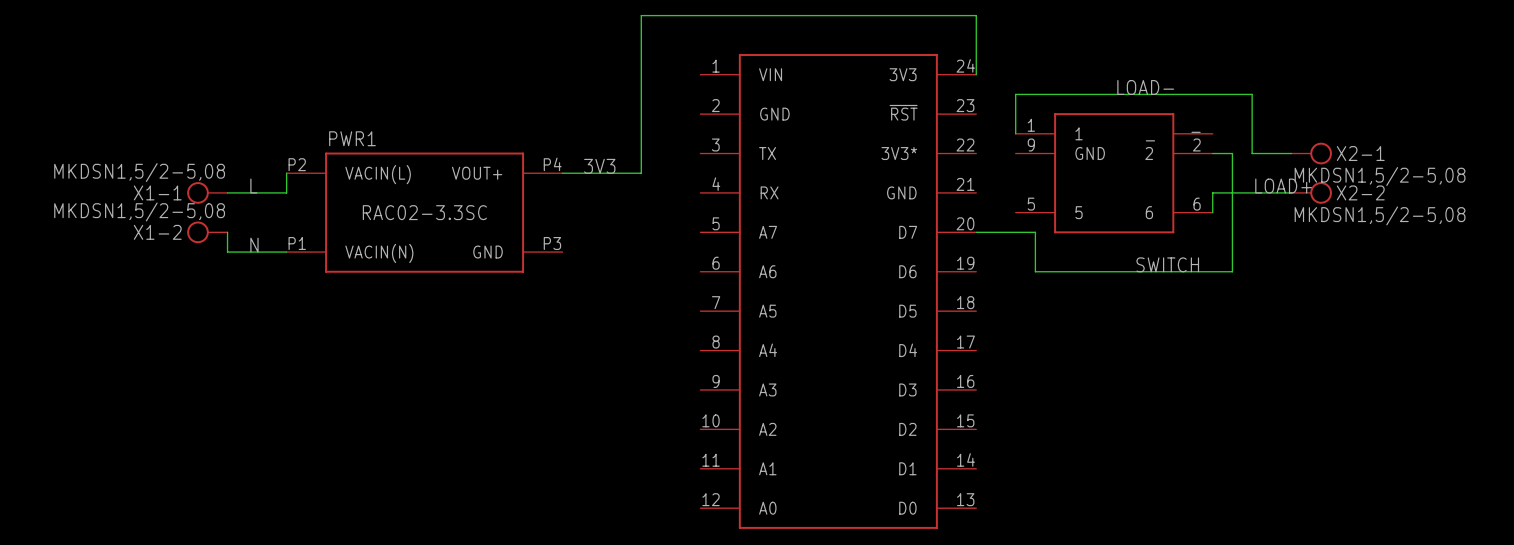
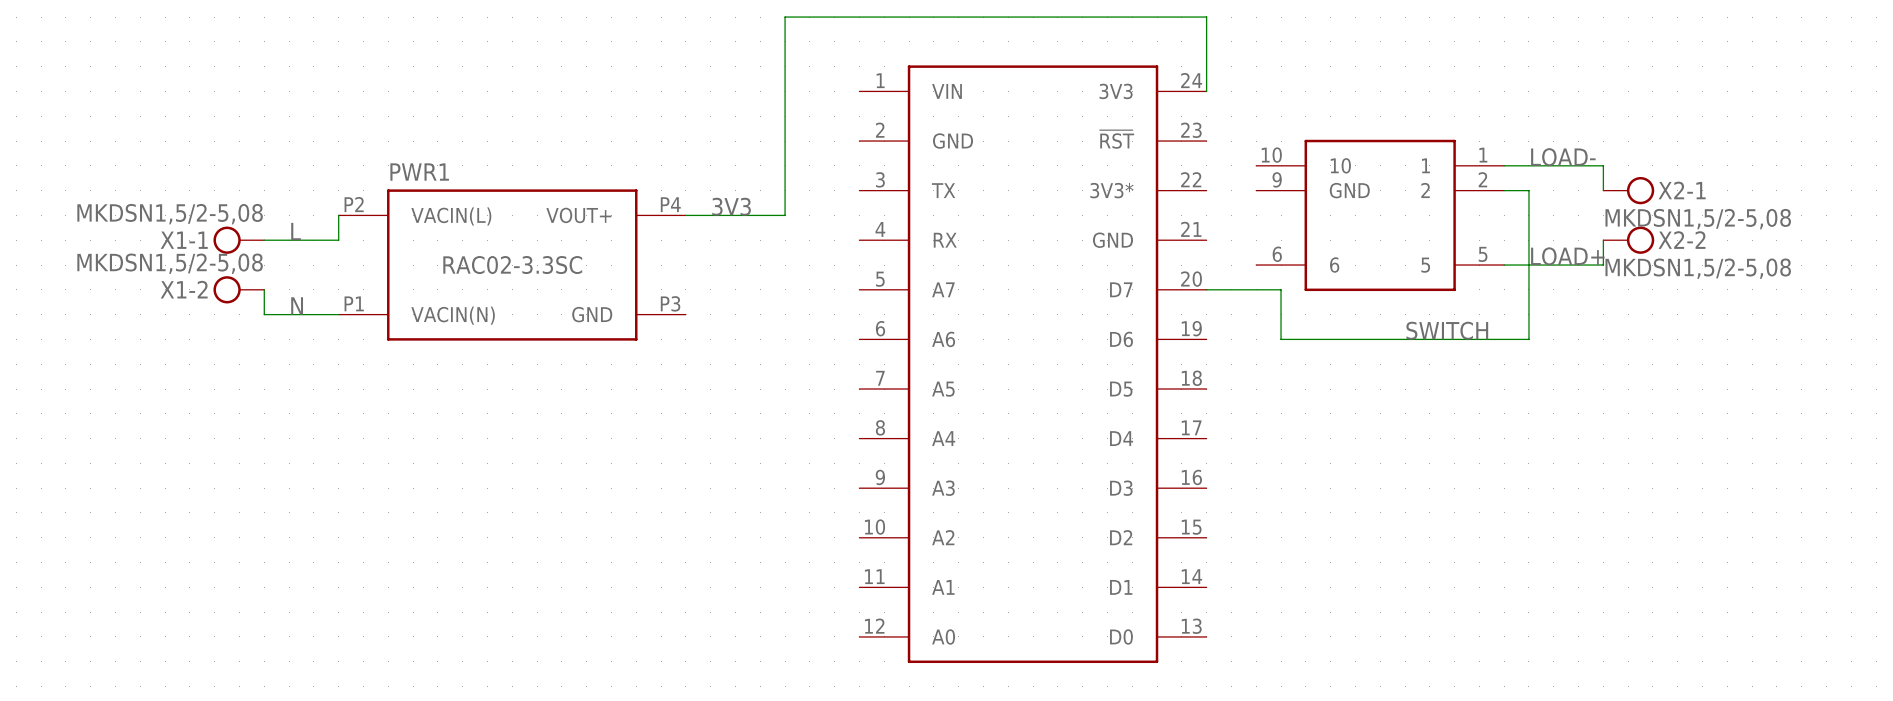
label position: LOAD- (1145, 87) -> LOAD- (1563, 157)
part pin number: 1 (1031, 125) -> 10 (1271, 155)
part pin number: _ (1196, 132) -> 1 (1483, 155)
wire: (1015, 133) (1015, 94) (1252, 94) (1252, 153) (1291, 153) -> (1504, 165) (1603, 165) (1603, 190)
part pin name: 1 (1079, 133) -> 10 (1340, 165)
part pin name: _ (1150, 140) -> 1 (1425, 165)
label position: LOAD+ (1283, 186) -> LOAD+ (1567, 256)
wire: (1291, 192) (1212, 192) (1212, 212) -> (1603, 240) (1603, 265) (1504, 265)
part pin number: 5 (1031, 204) -> 6 (1277, 254)
part pin number: 6 (1197, 204) -> 5 (1483, 254)
part pin name: 5 (1079, 212) -> 6 (1334, 265)
part pin name: 6 (1149, 212) -> 5 (1425, 265)

